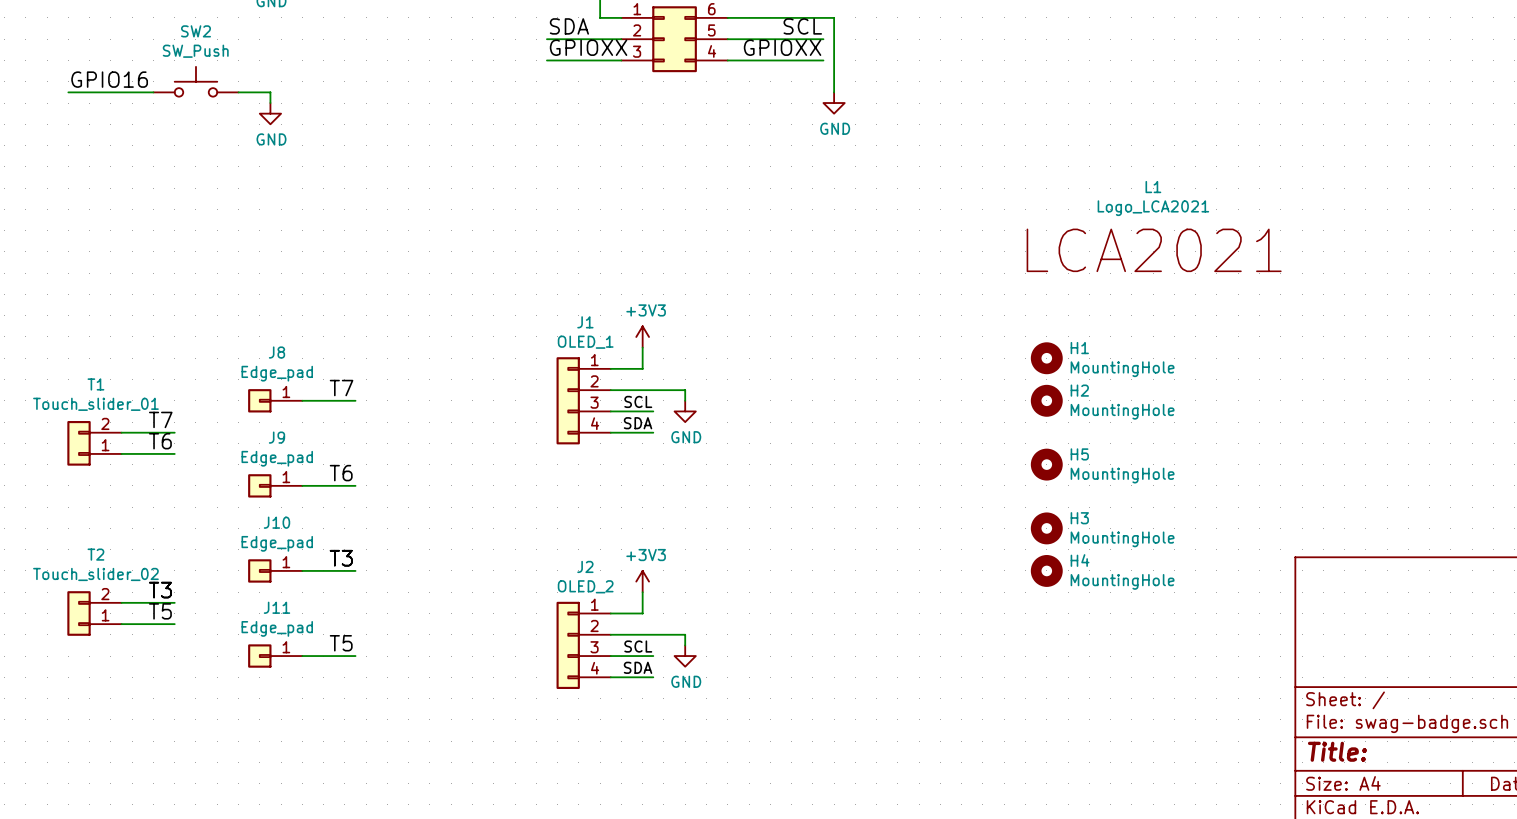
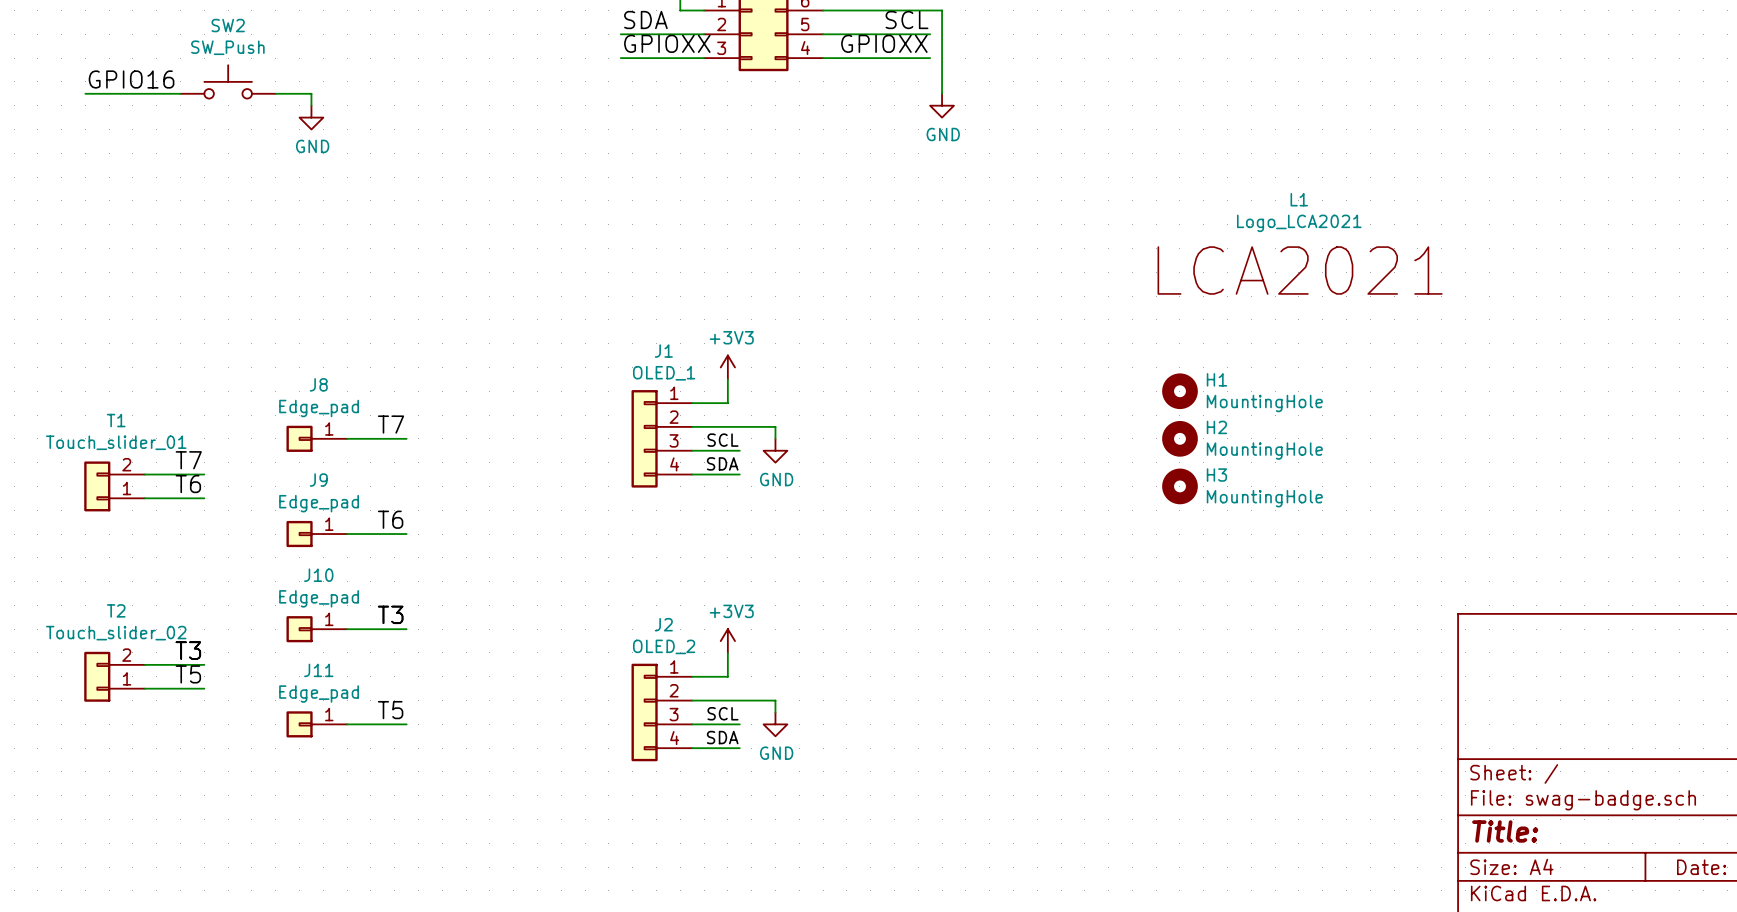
H5: MountingHole (1046, 464) -> none
H3 position: (1046, 528) -> (1179, 486)
H4: MountingHole (1046, 570) -> none

